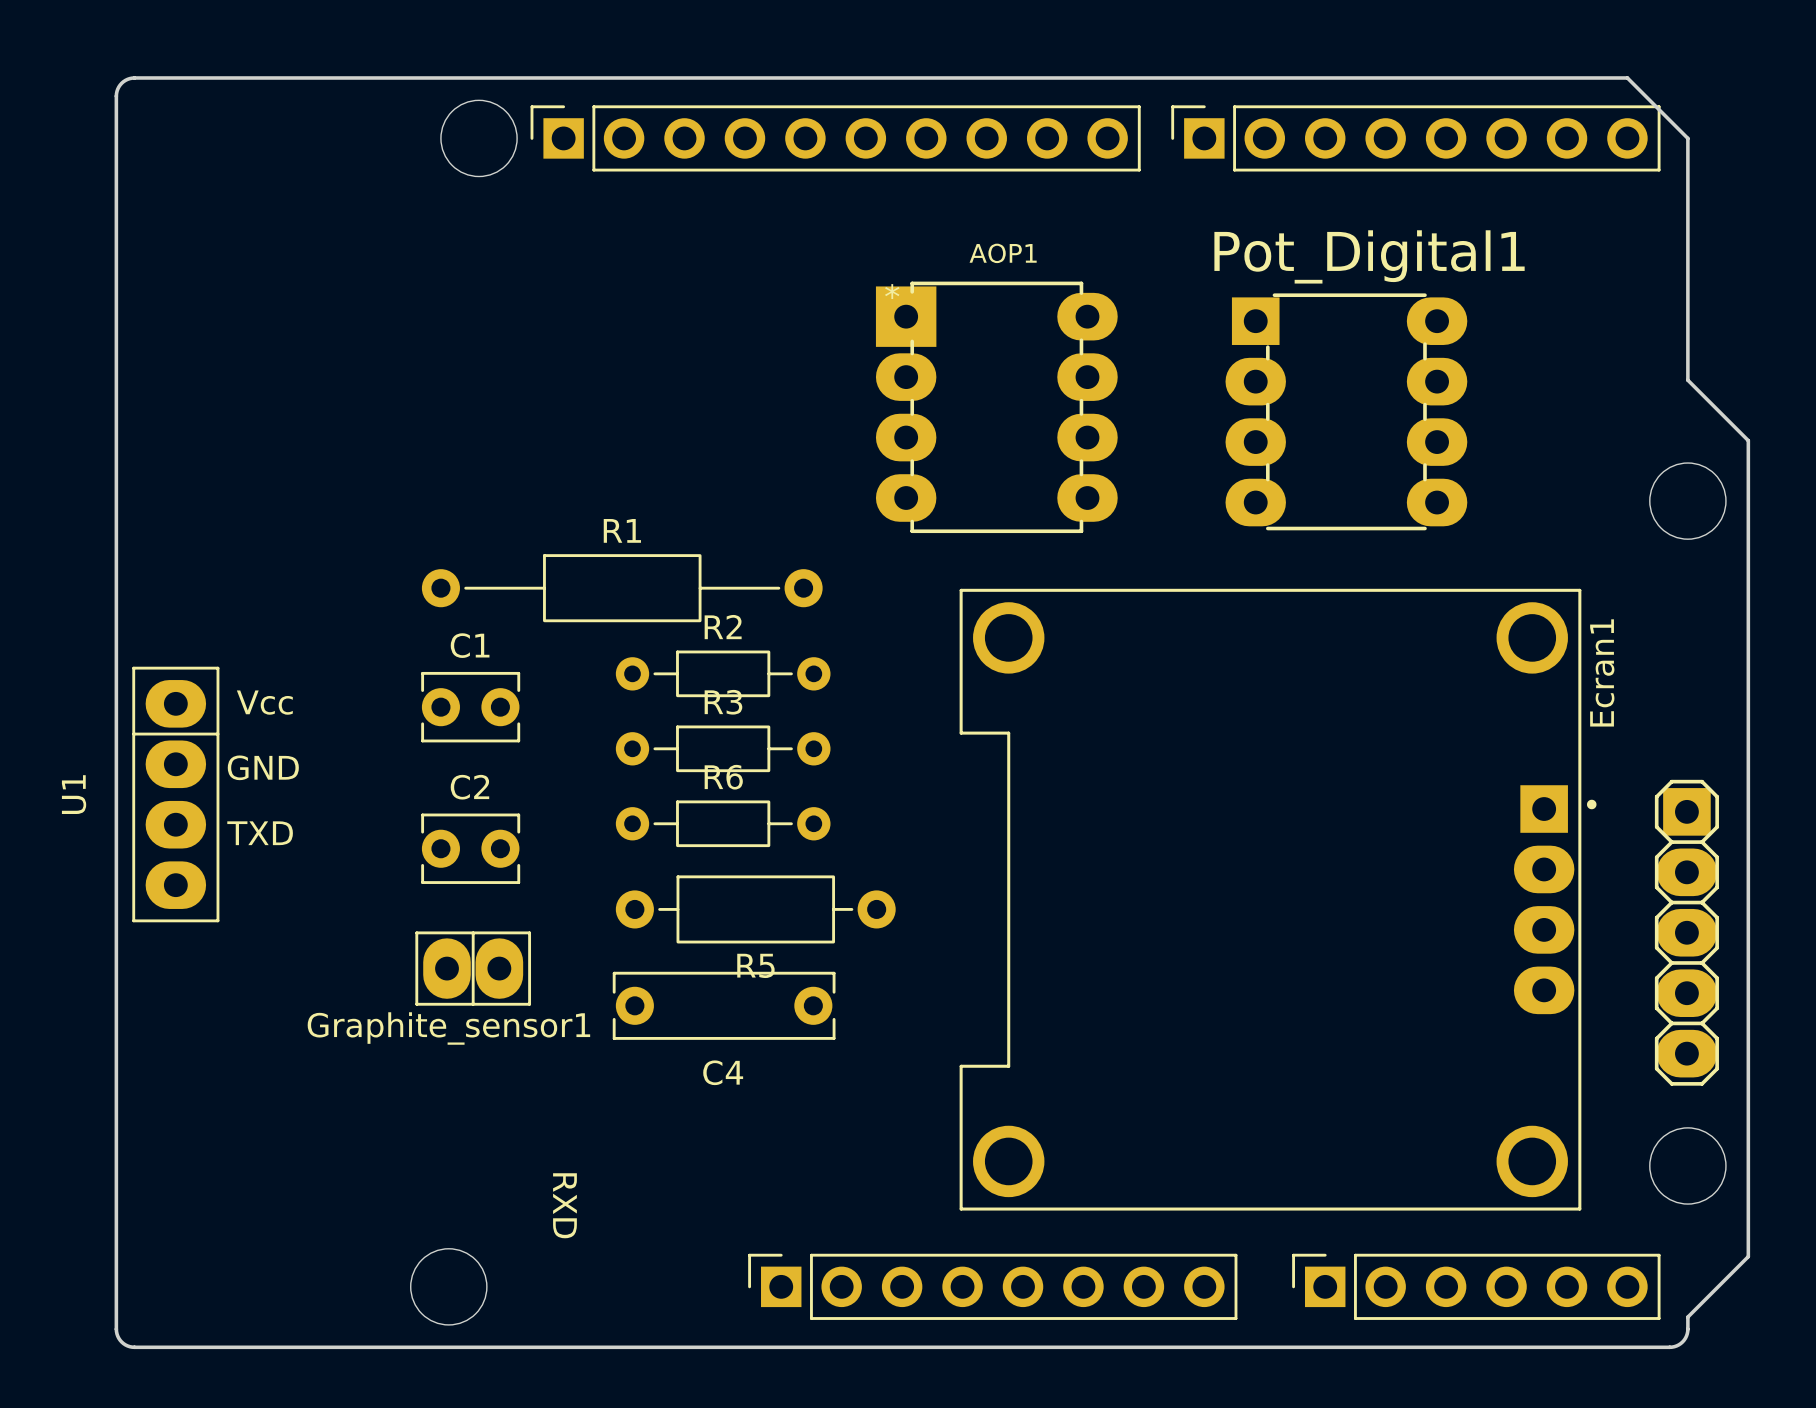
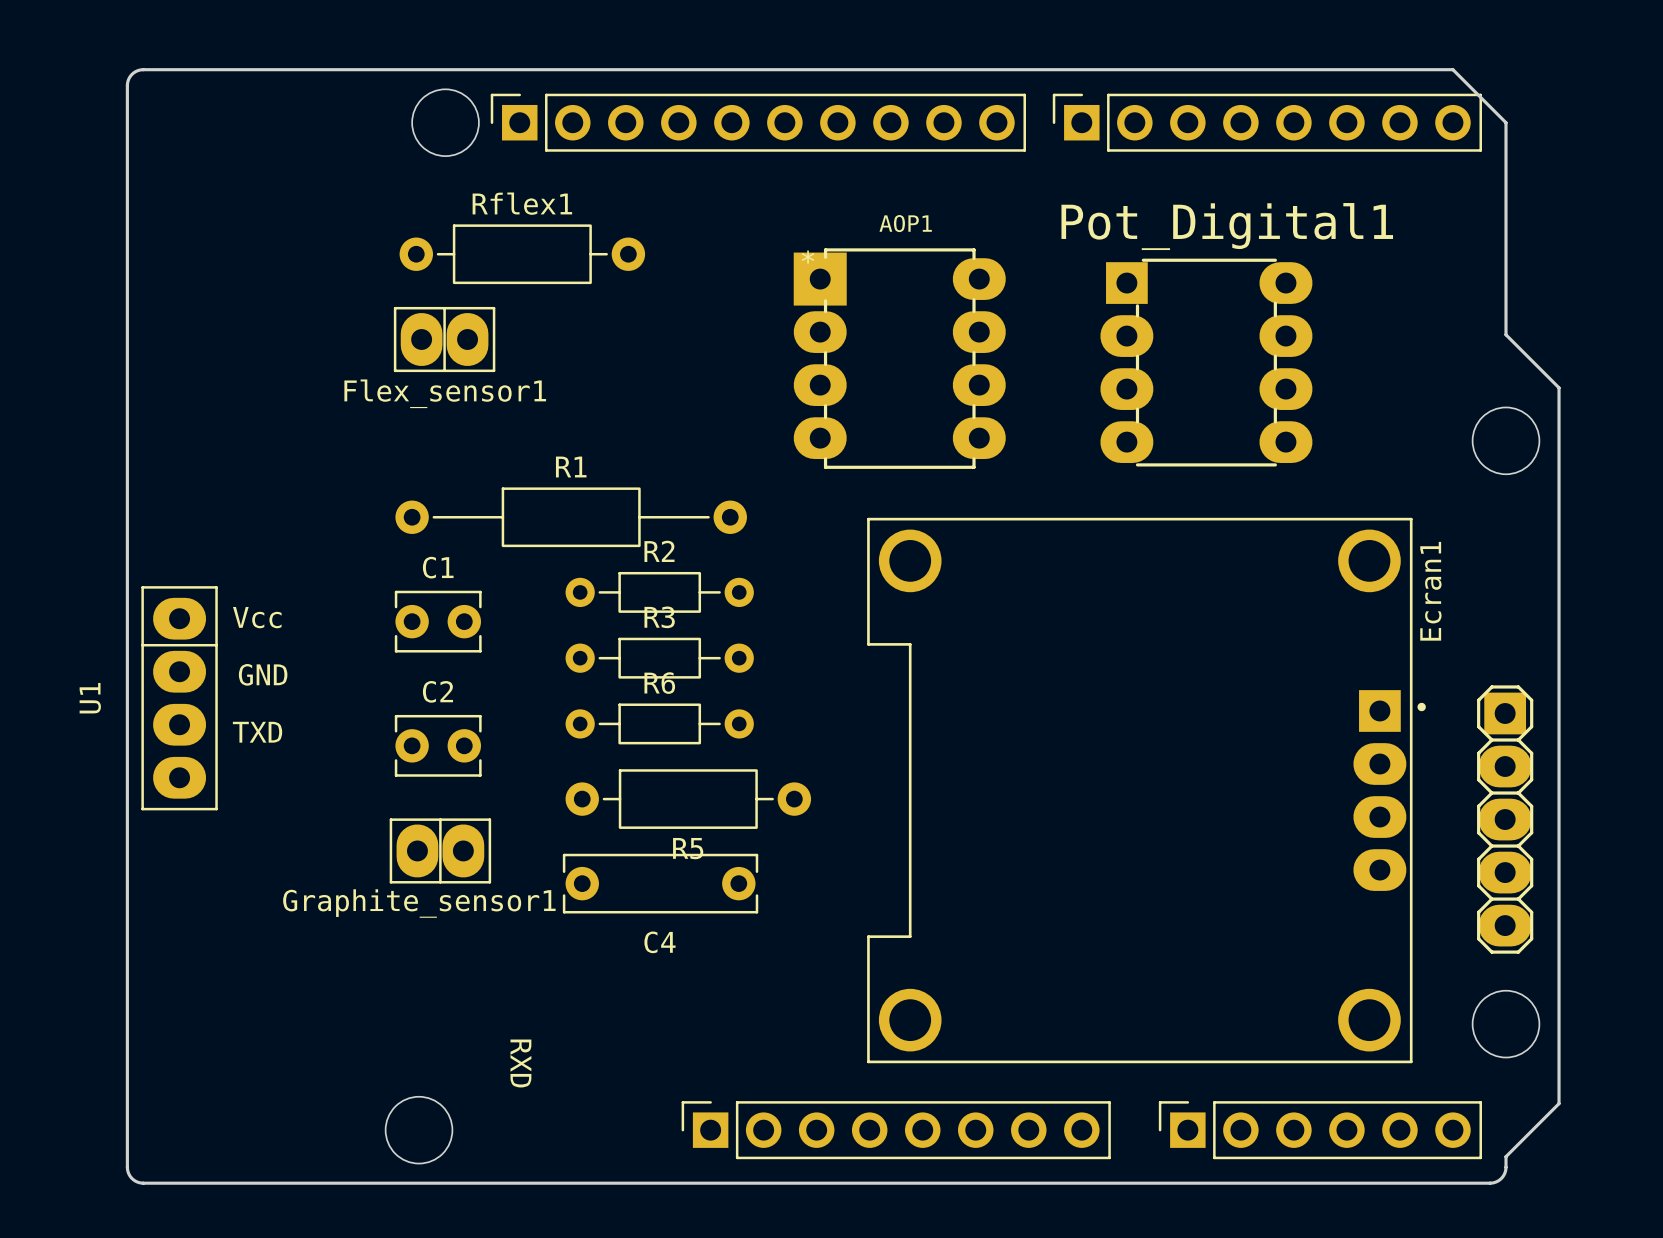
Rflex1: none -> (522, 254)
Flex_sensor1: none -> (444, 339)

